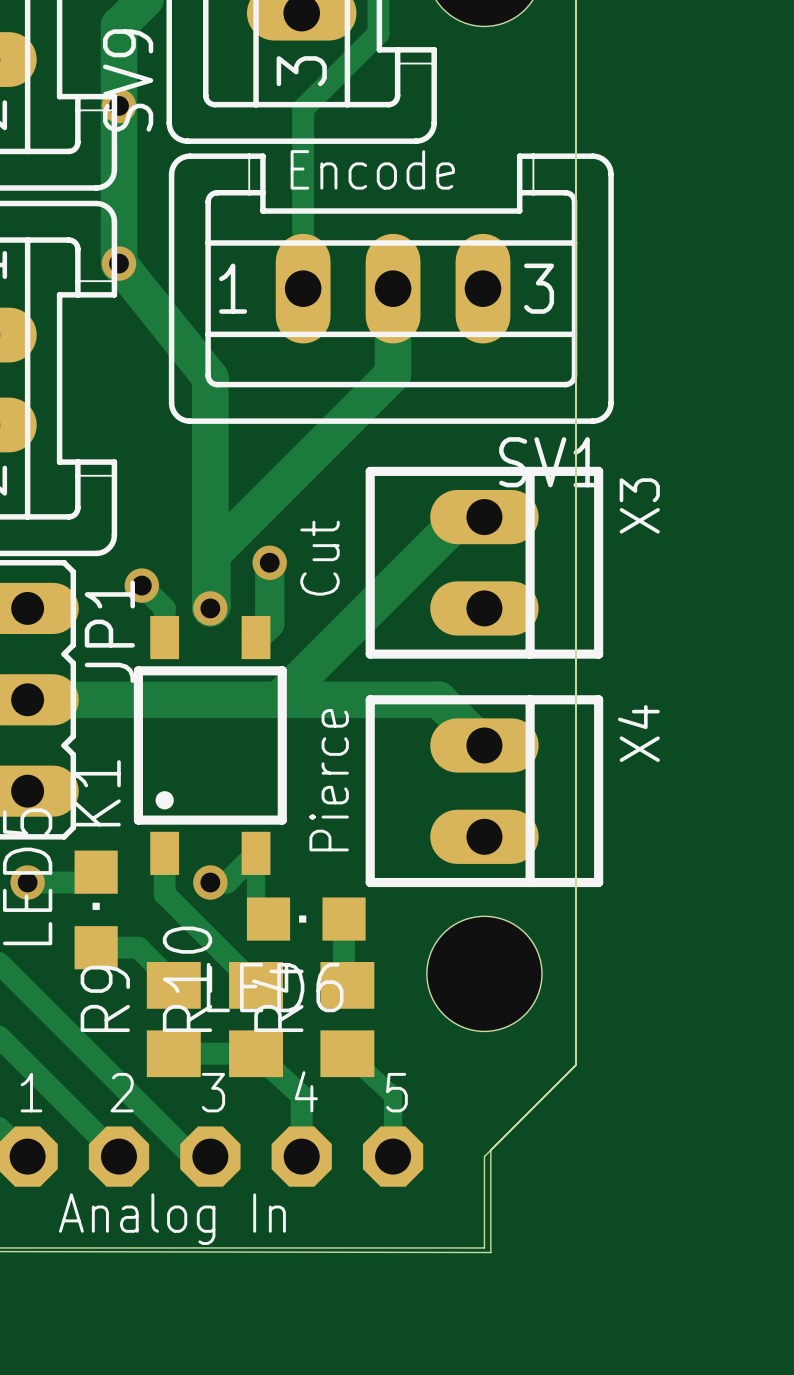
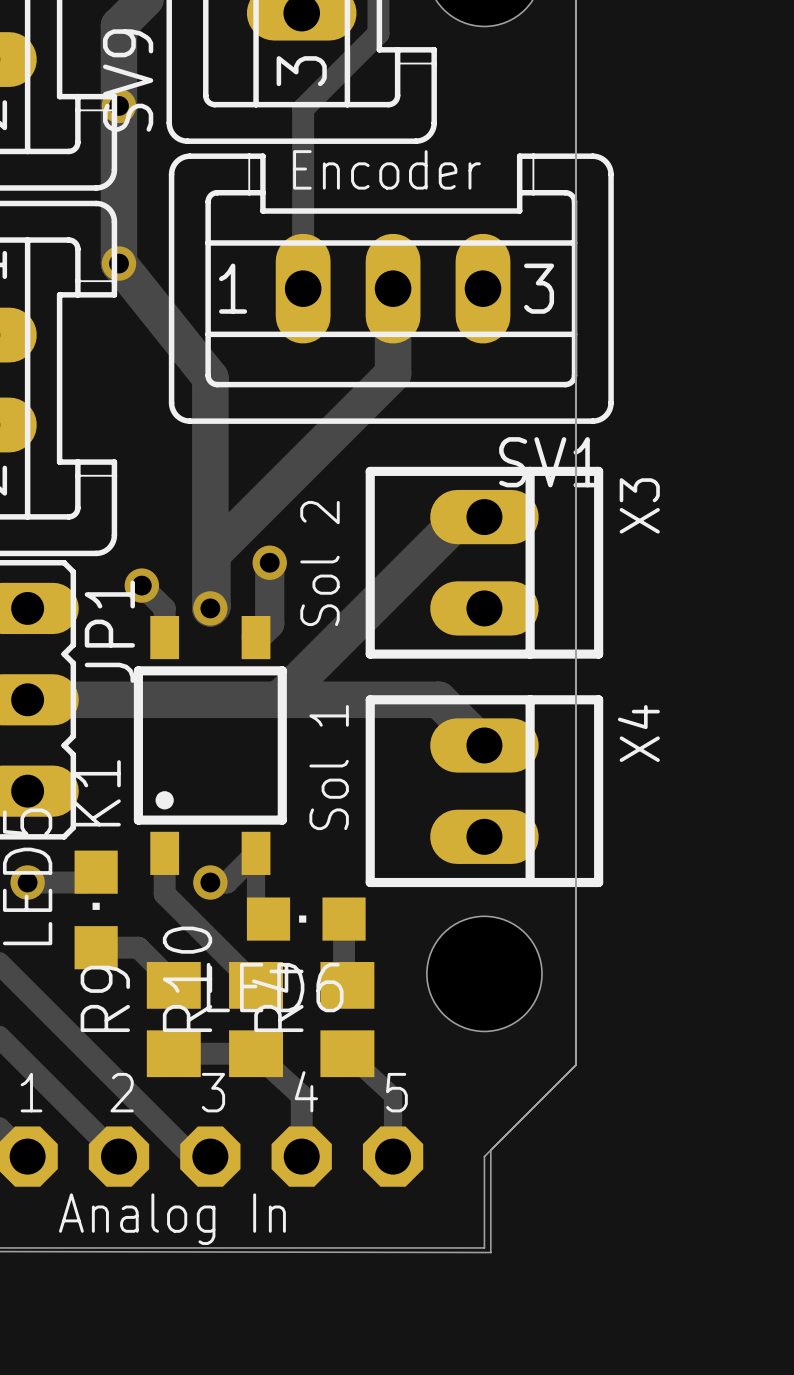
text: Encode (372, 169) -> Encoder (386, 169)
text: Cut (319, 558) -> Sol 2 (319, 563)
text: Pierce (329, 780) -> Sol 1 (329, 767)

